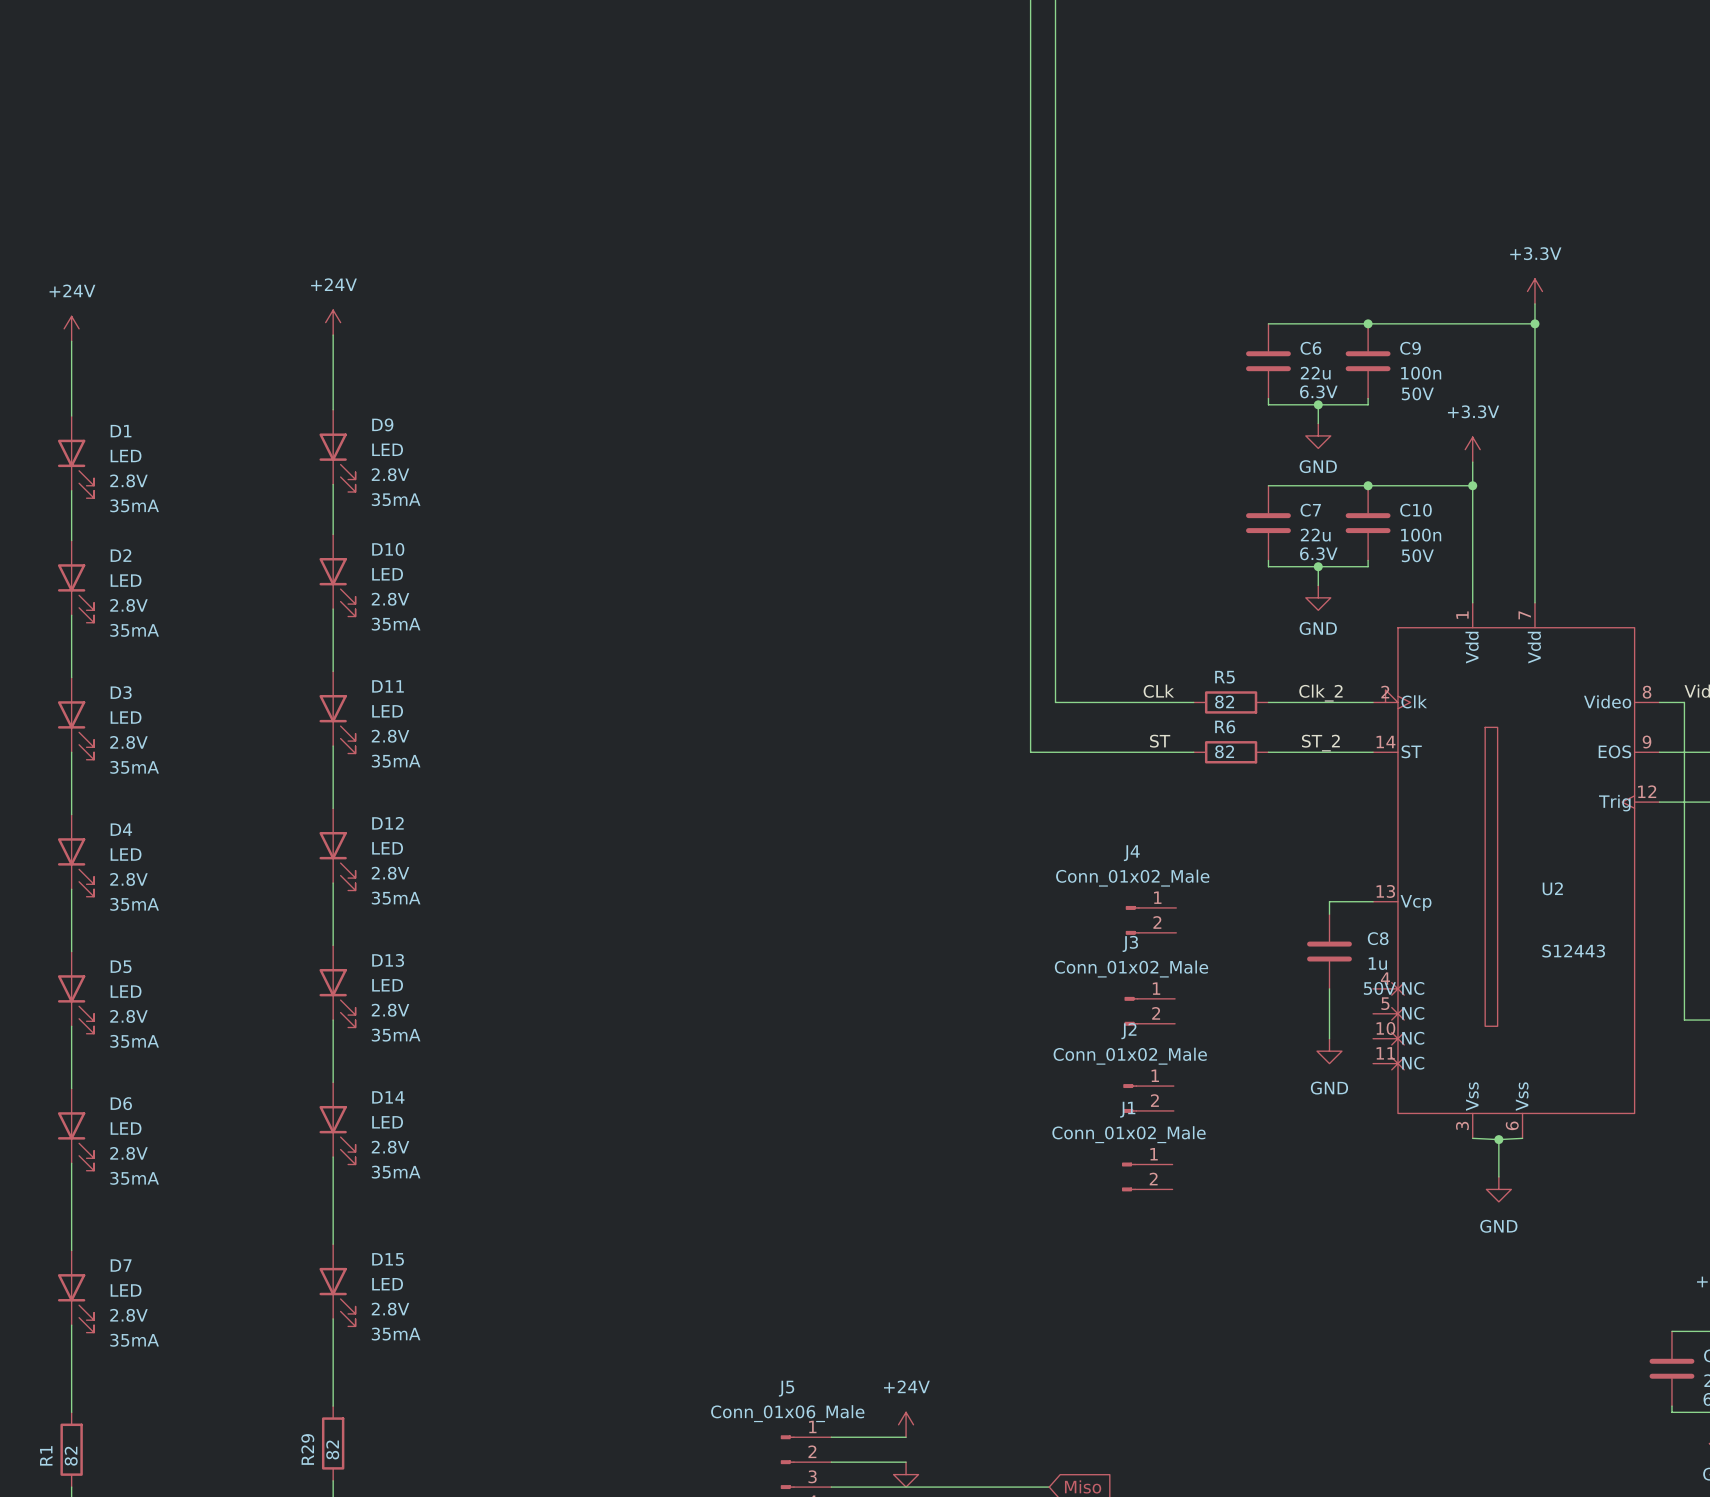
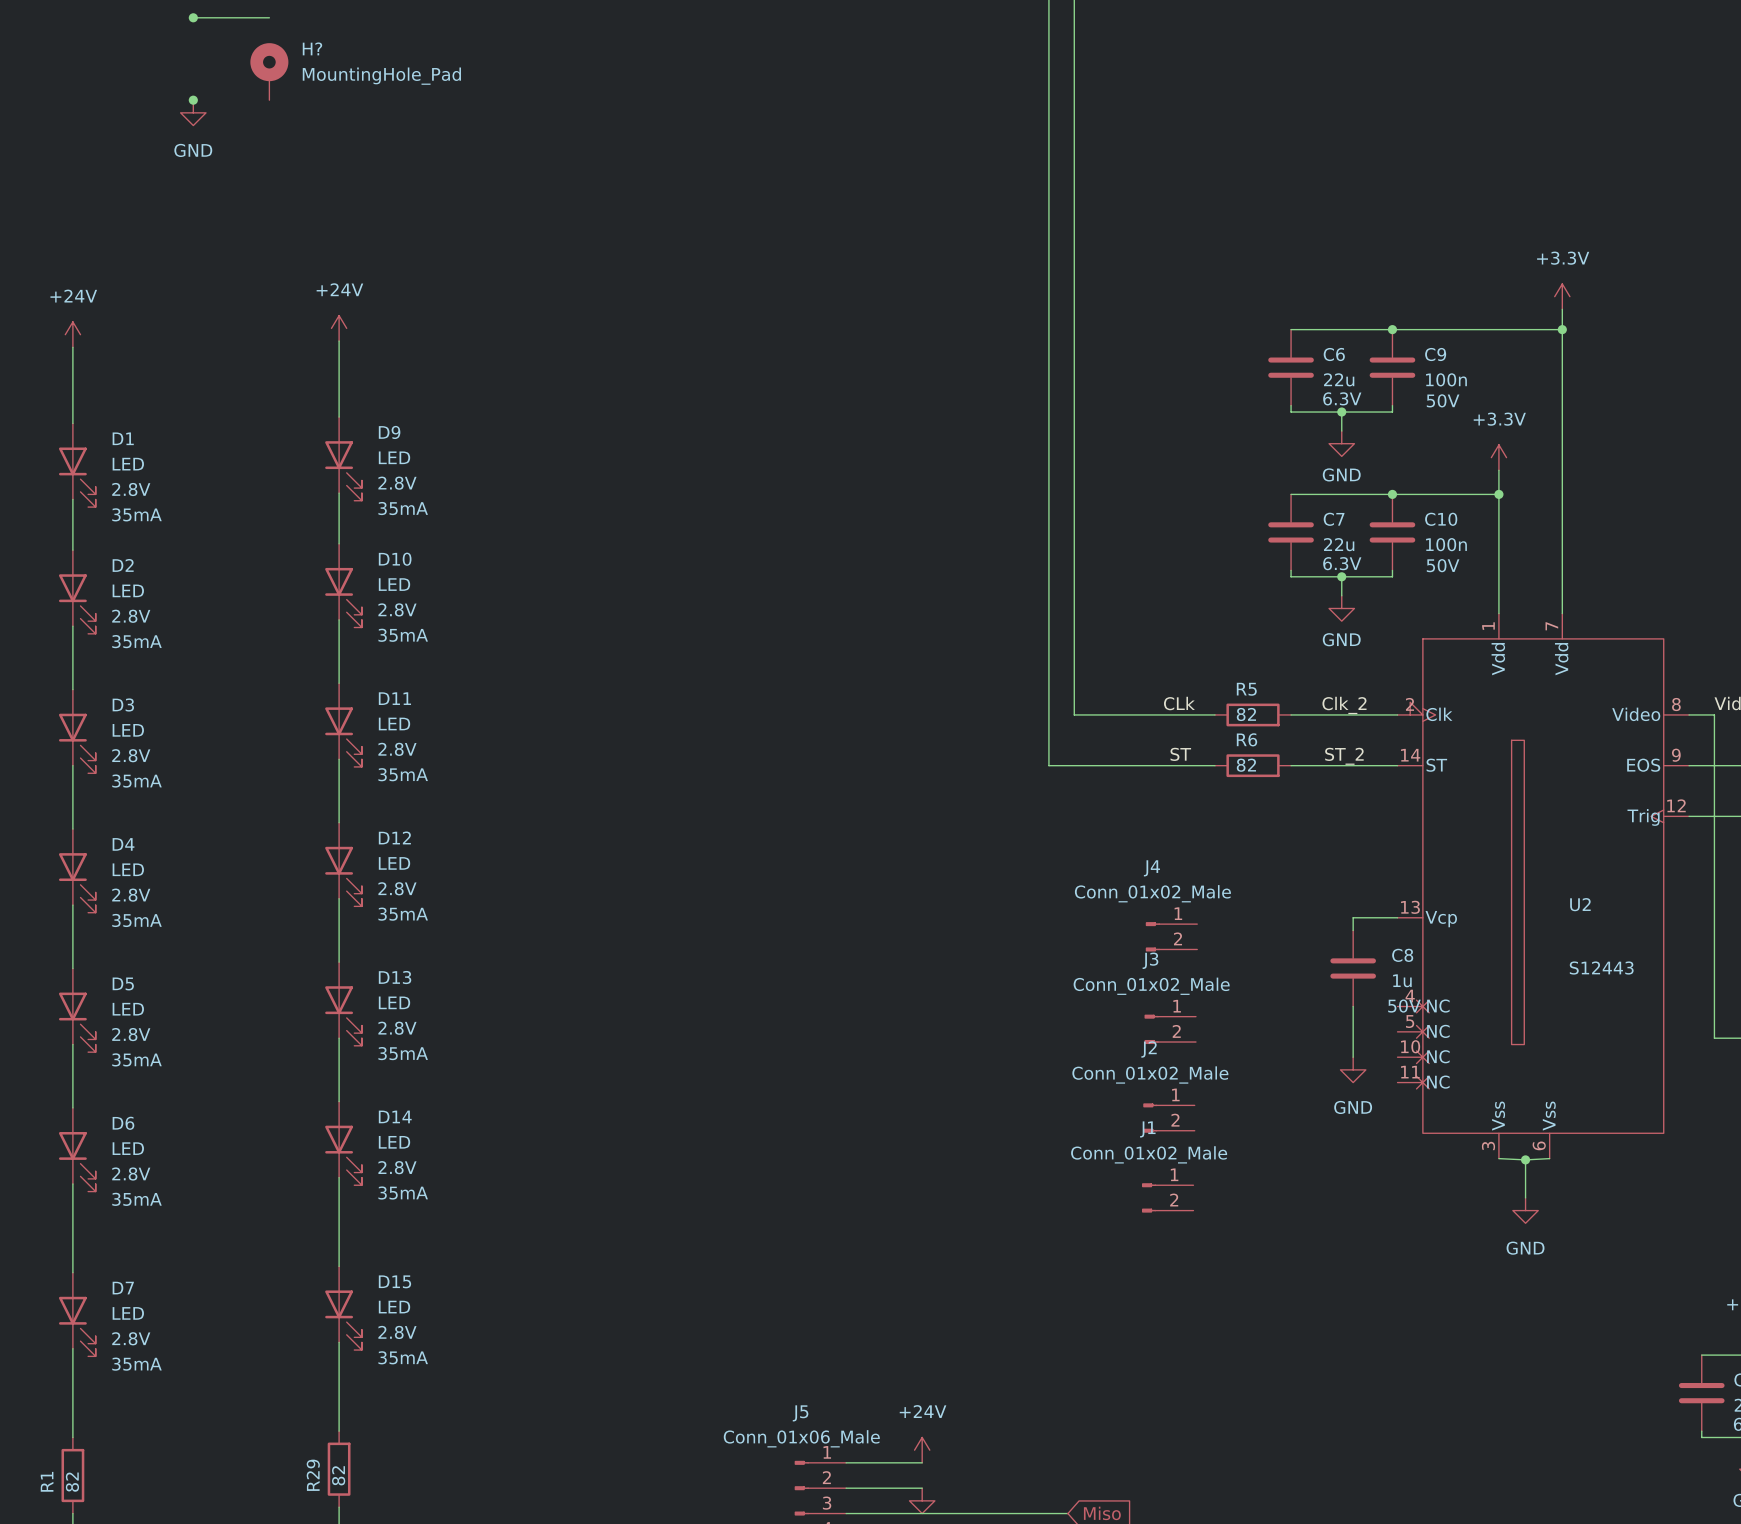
wire: none -> (193, 17) (269, 17)
junction: none -> (193, 17)
H?: none -> MountingHole_Pad (269, 71)
junction: none -> (193, 100)
power symbol: none -> GND (193, 112)

